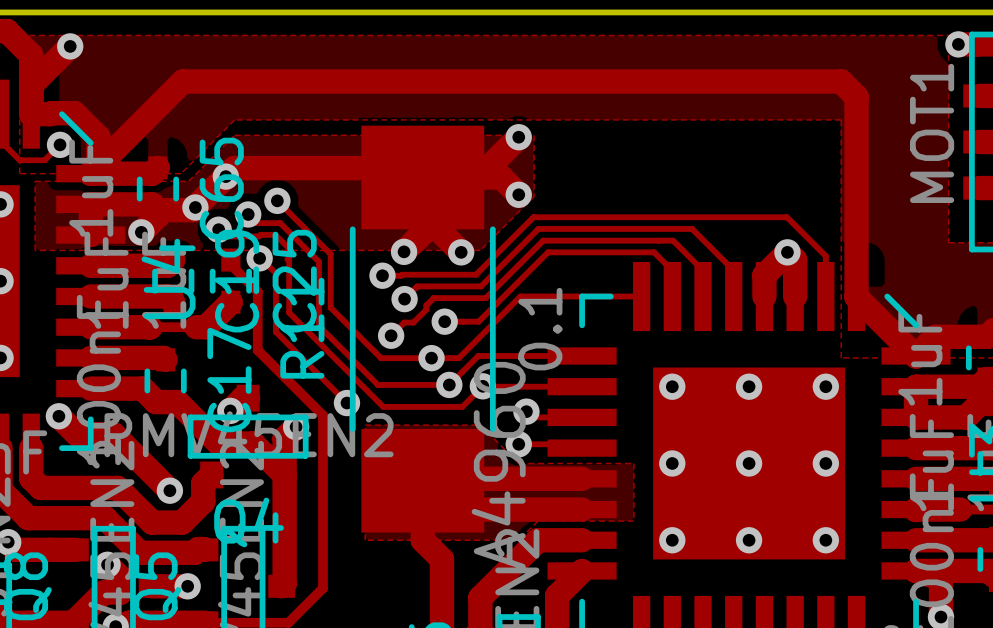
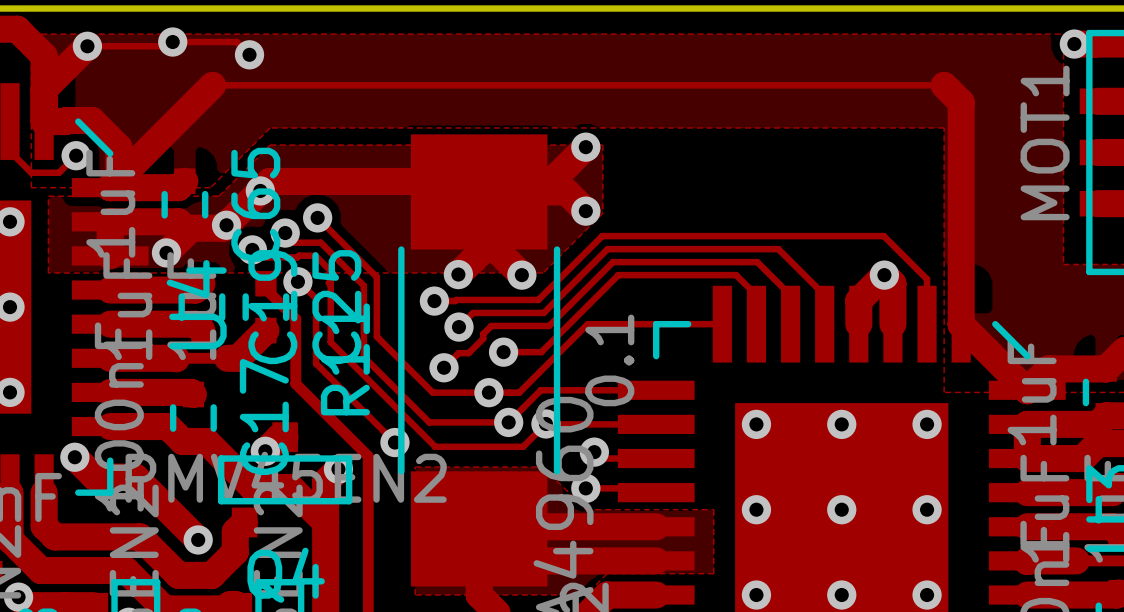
track: none -> (172, 42) (168, 46) (87, 46)
via: none -> (172, 42)
track: none -> (177, 42) (236, 42) (249, 54)
via: none -> (249, 54)
track width: thick (182, 81) (841, 81) -> thin (212, 85) (944, 85)

